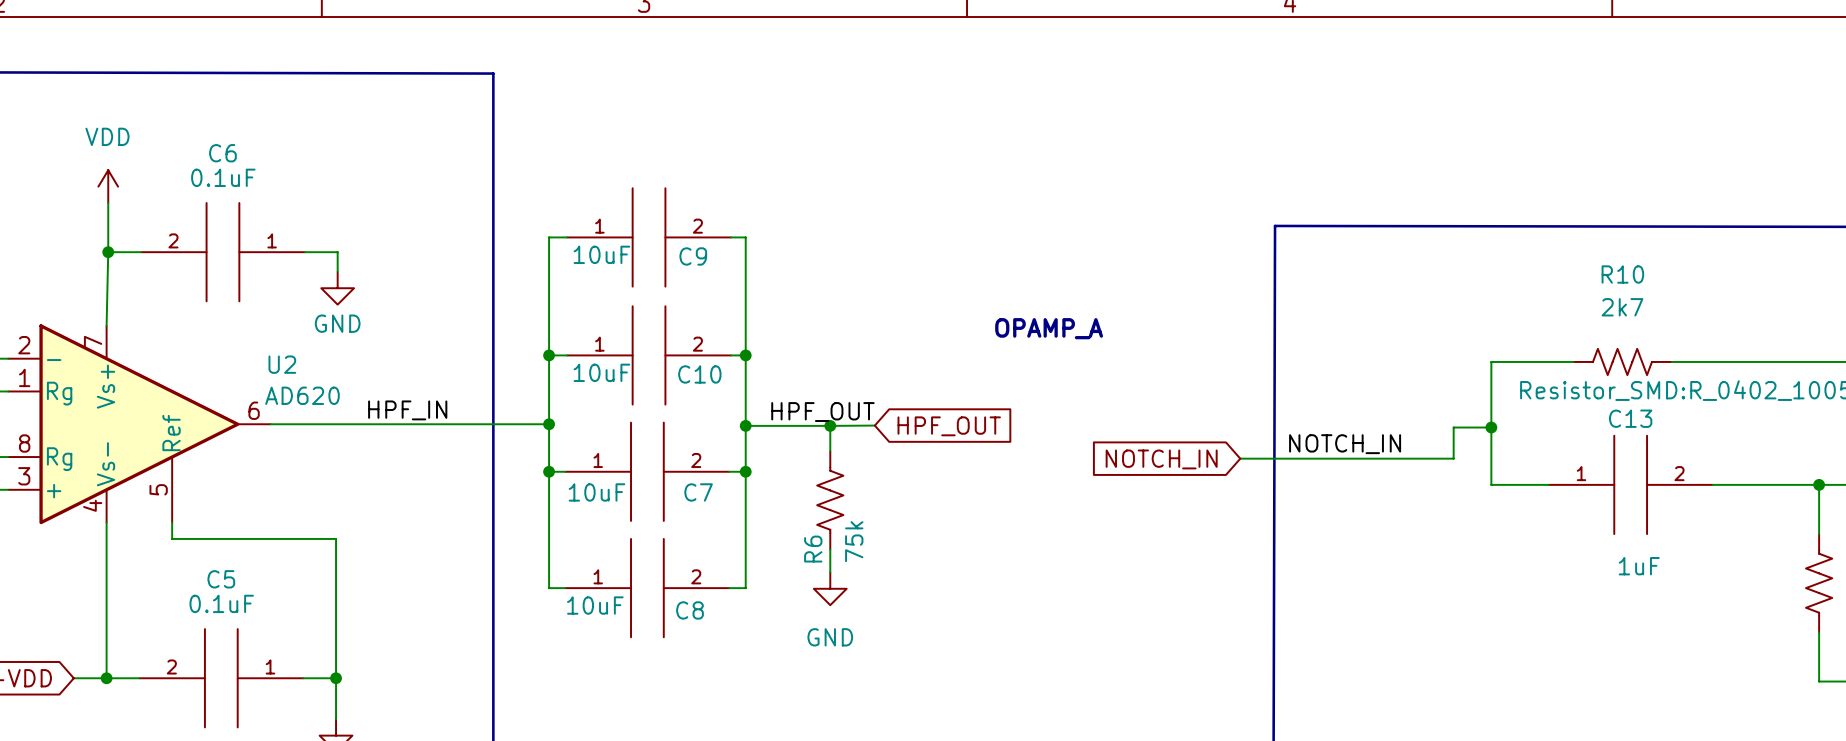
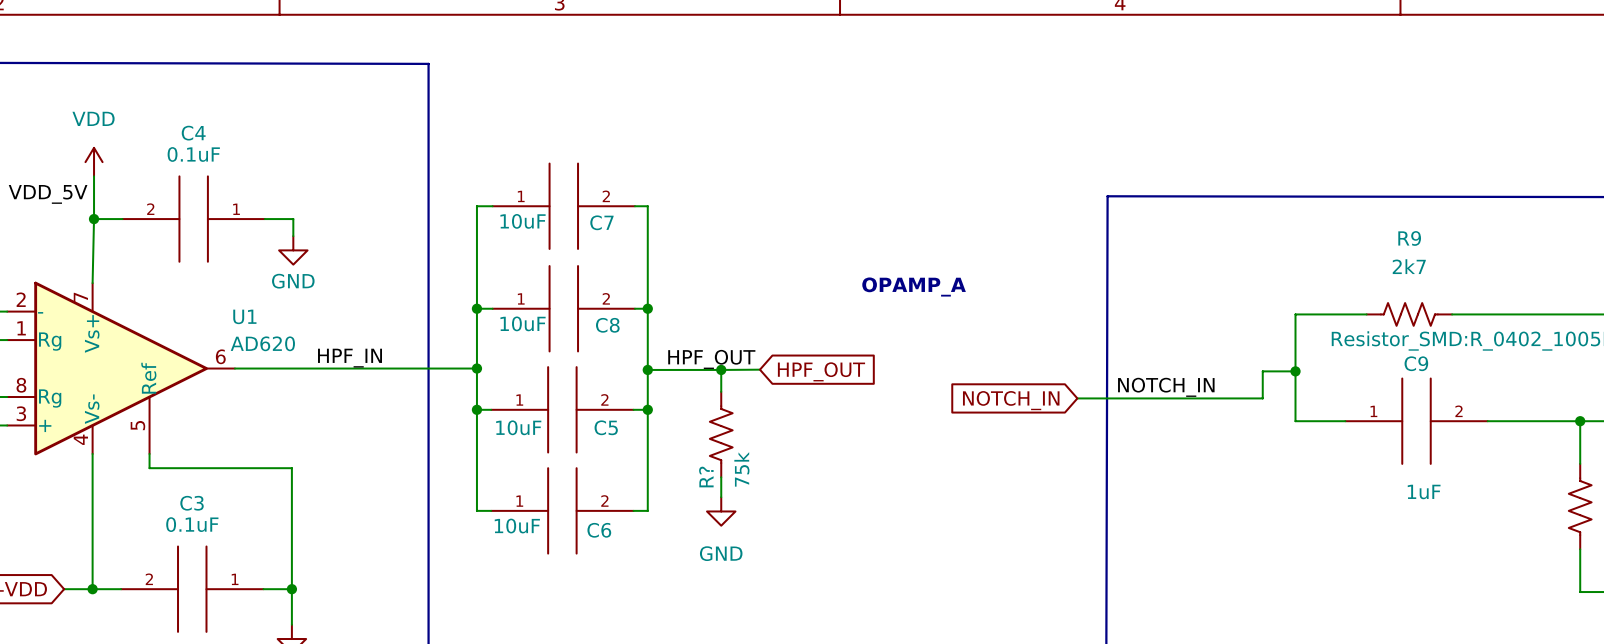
C6 name: C6 (222, 153) -> C4 (193, 133)
label: none -> VDD_5V (48, 194)
C9 name: C9 (693, 256) -> C7 (601, 222)
R10 name: R10 (1622, 274) -> R9 (1409, 238)
U2 name: U2 (282, 364) -> U1 (244, 316)
C10 name: C10 (699, 374) -> C8 (607, 325)
C13 name: C13 (1630, 418) -> C9 (1416, 363)
C7 name: C7 (698, 492) -> C5 (606, 427)
R6 name: R6 (813, 549) -> R? (706, 477)
C5 name: C5 (221, 579) -> C3 (192, 503)
C8 name: C8 (690, 610) -> C6 (599, 530)

